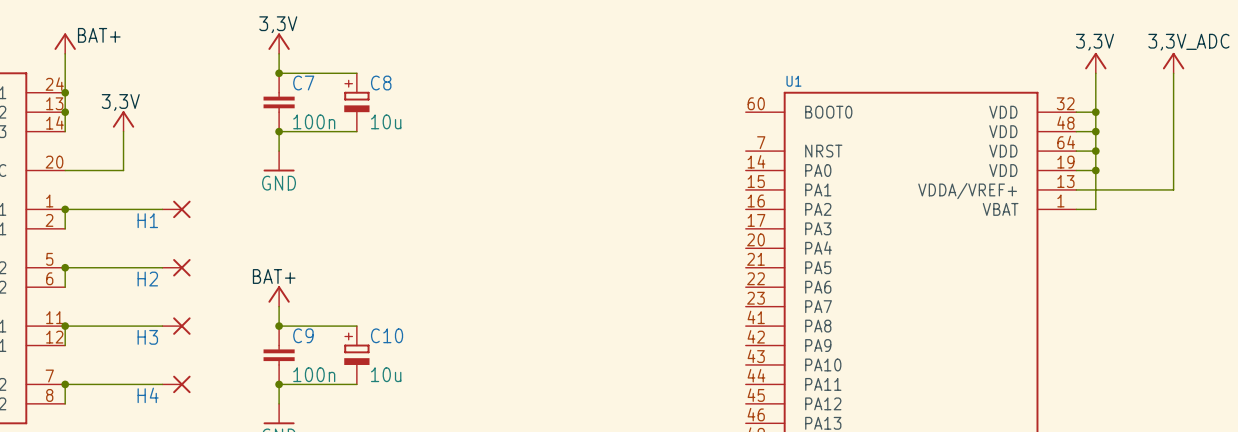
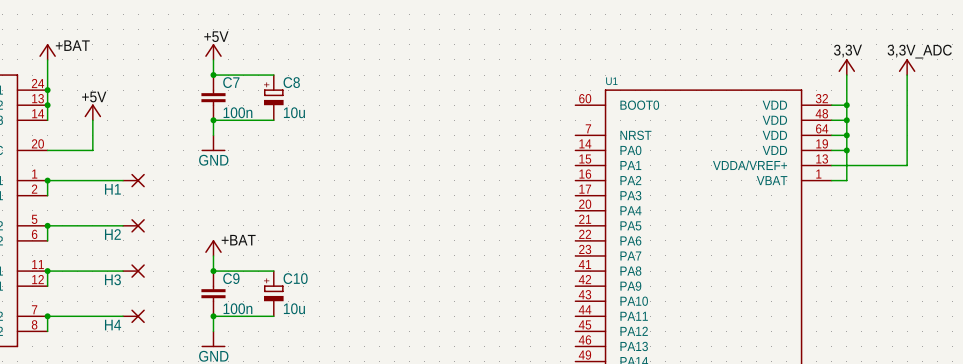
label: 3,3V (278, 24) -> +5V (216, 36)
label: BAT+ (99, 35) -> +BAT (72, 45)
label: 3,3V (120, 102) -> +5V (94, 96)
label: BAT+ (274, 276) -> +BAT (238, 240)

